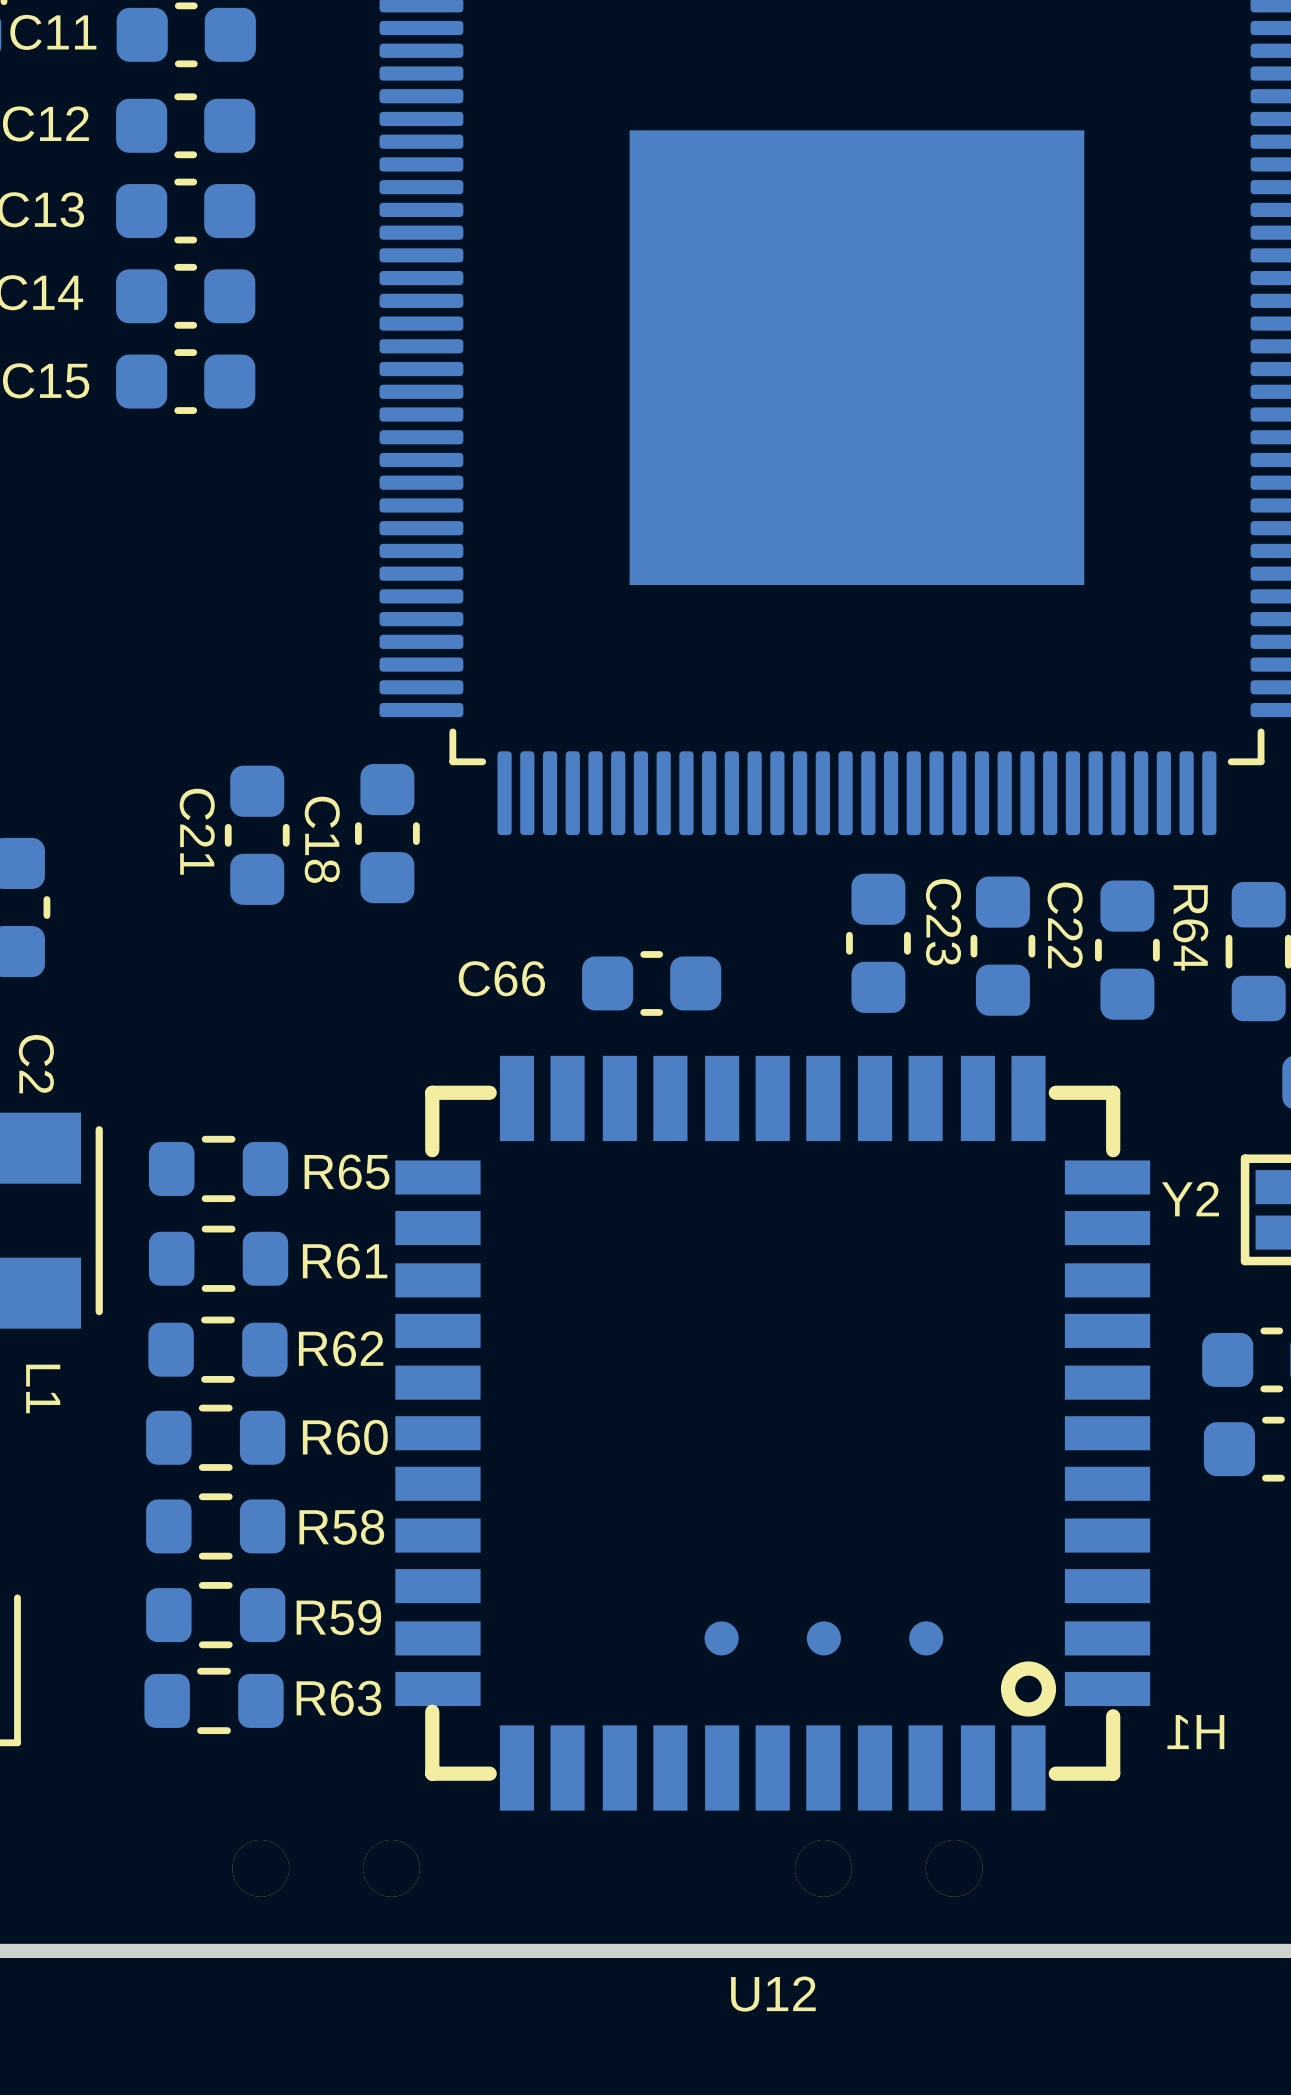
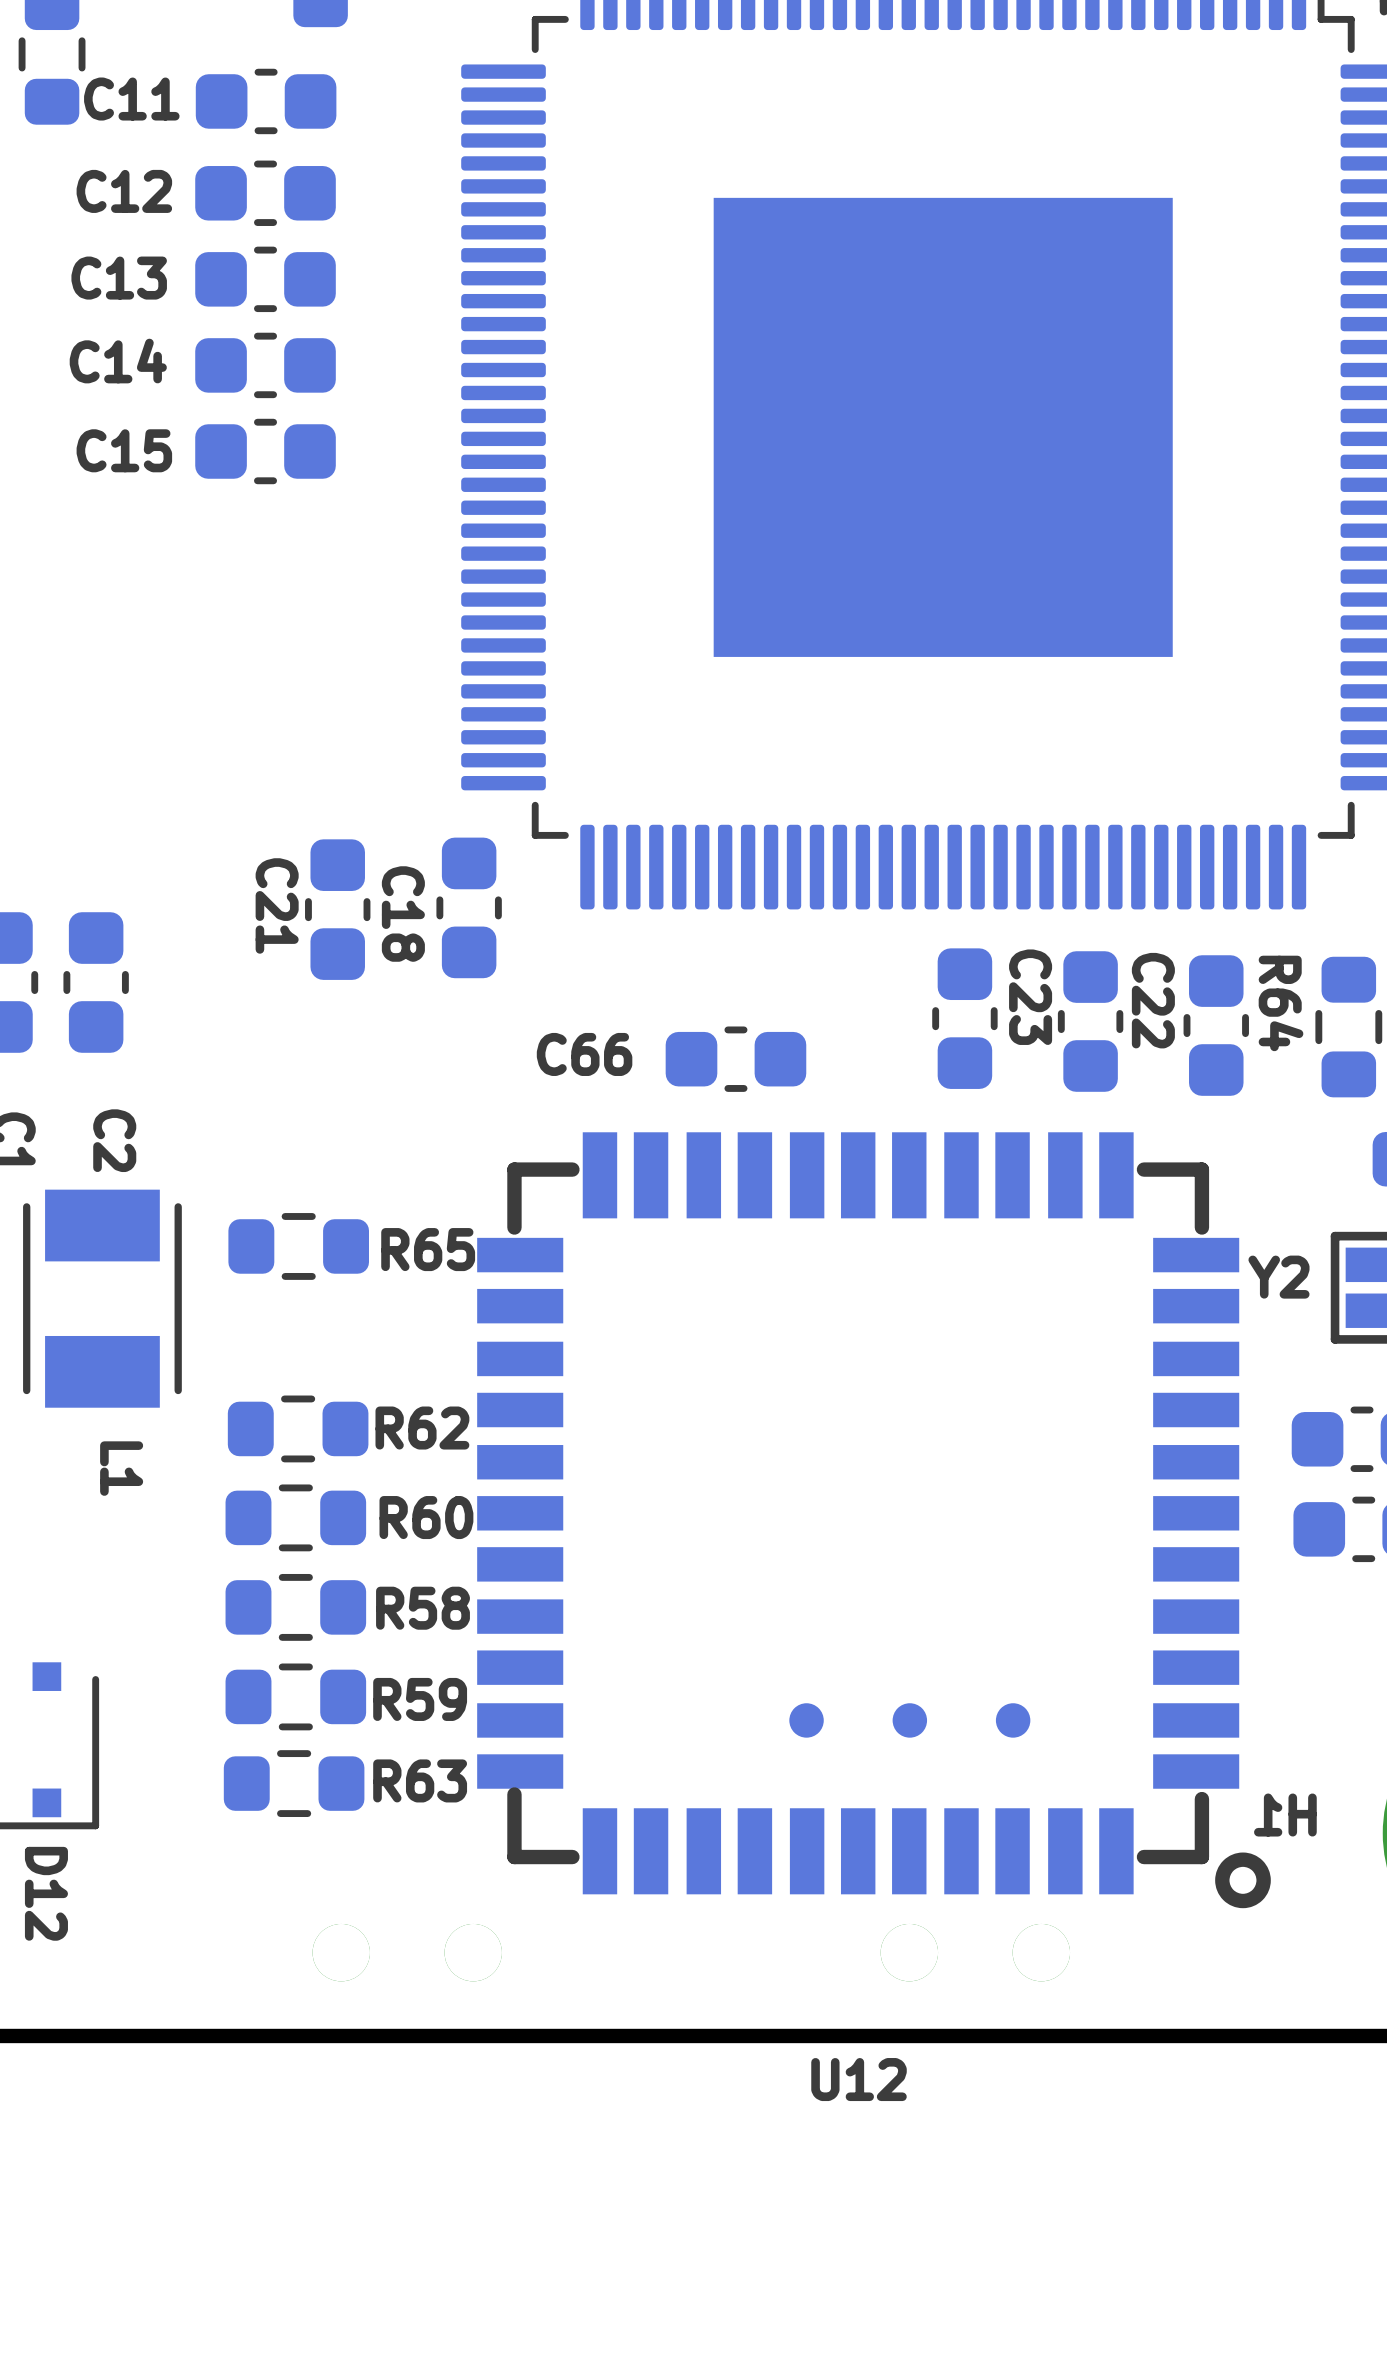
U12 footprint: [395, 1055, 1151, 1811] -> [477, 1132, 1271, 1909]
R61: (218, 1258) -> none

